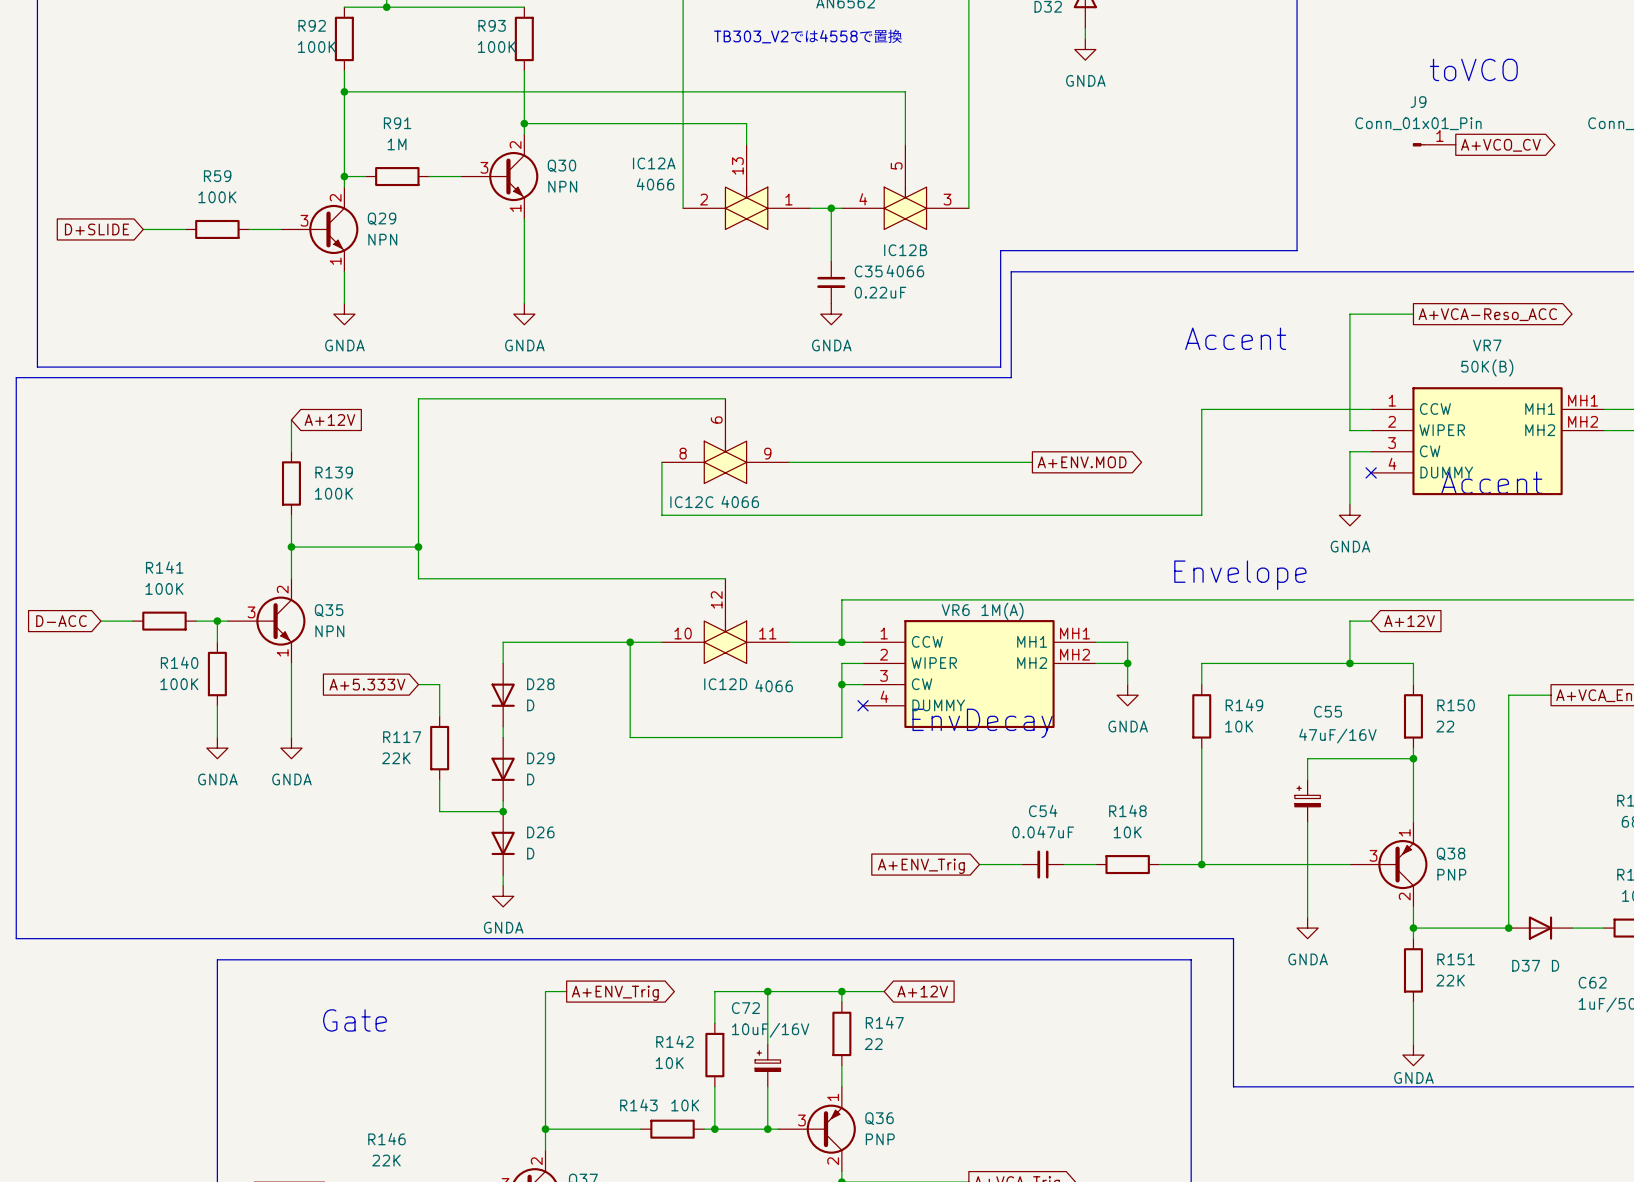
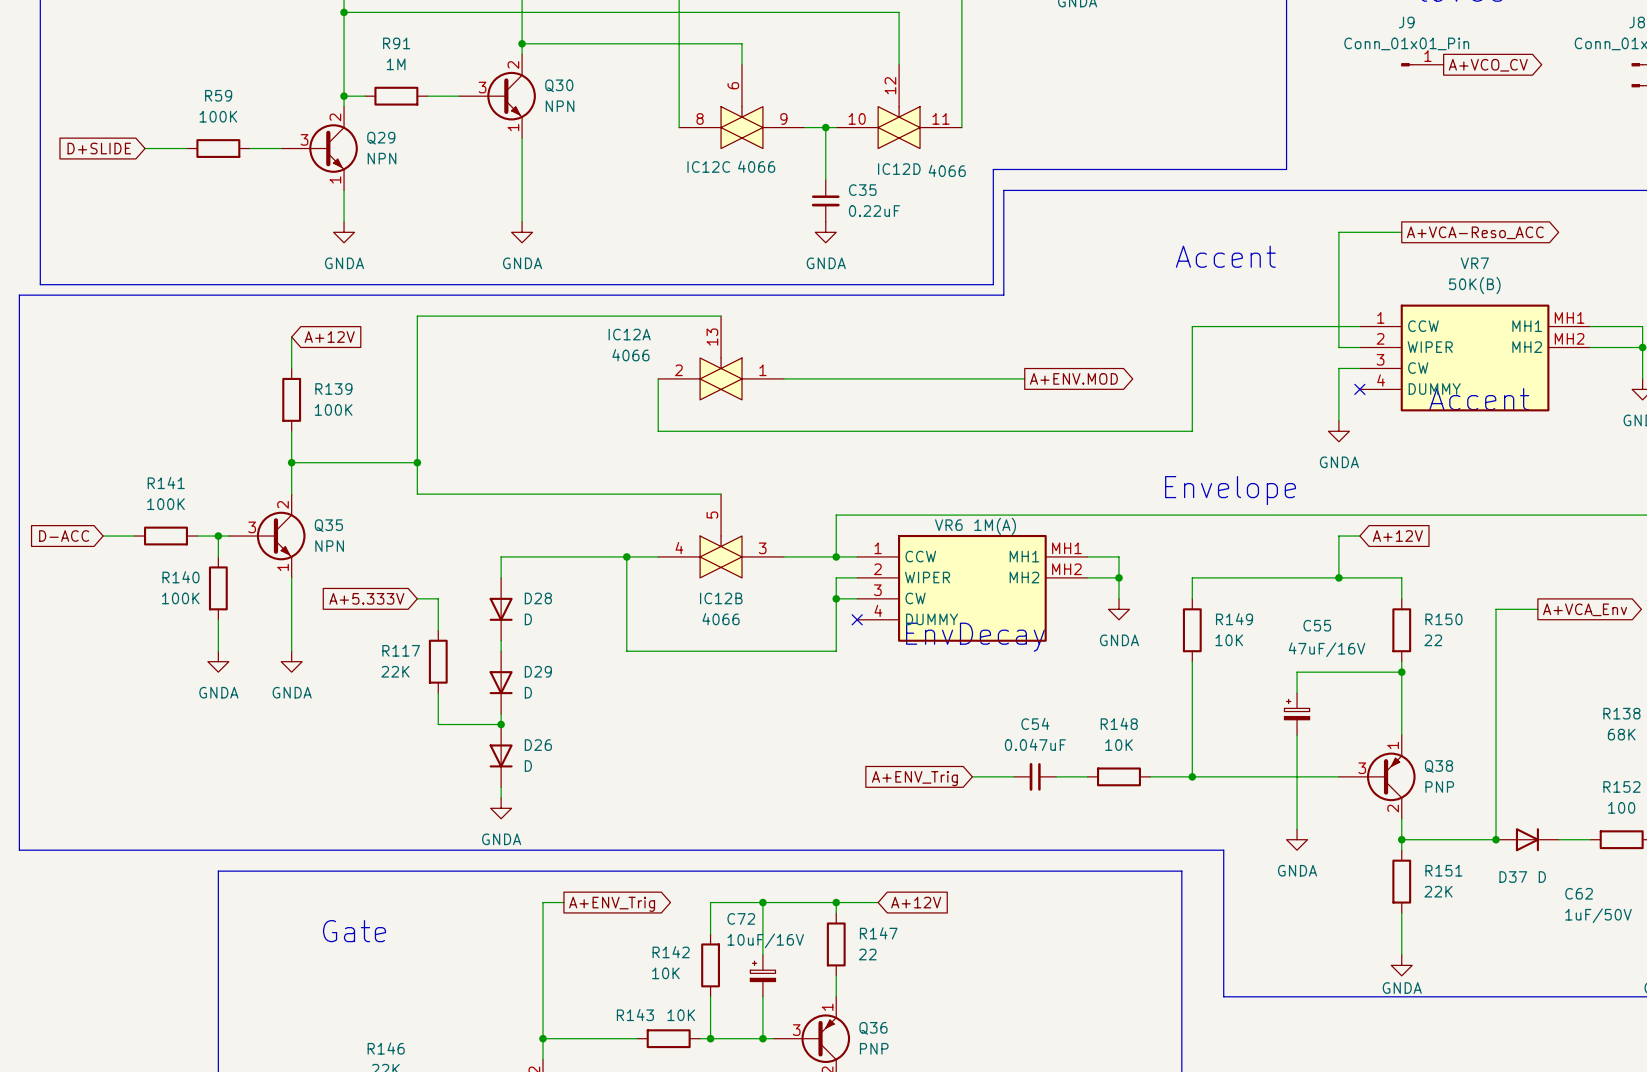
IC12A position: (746, 187) -> (721, 357)
IC12B position: (905, 187) -> (721, 536)
IC12C position: (725, 441) -> (741, 106)
IC12D position: (725, 621) -> (899, 106)

